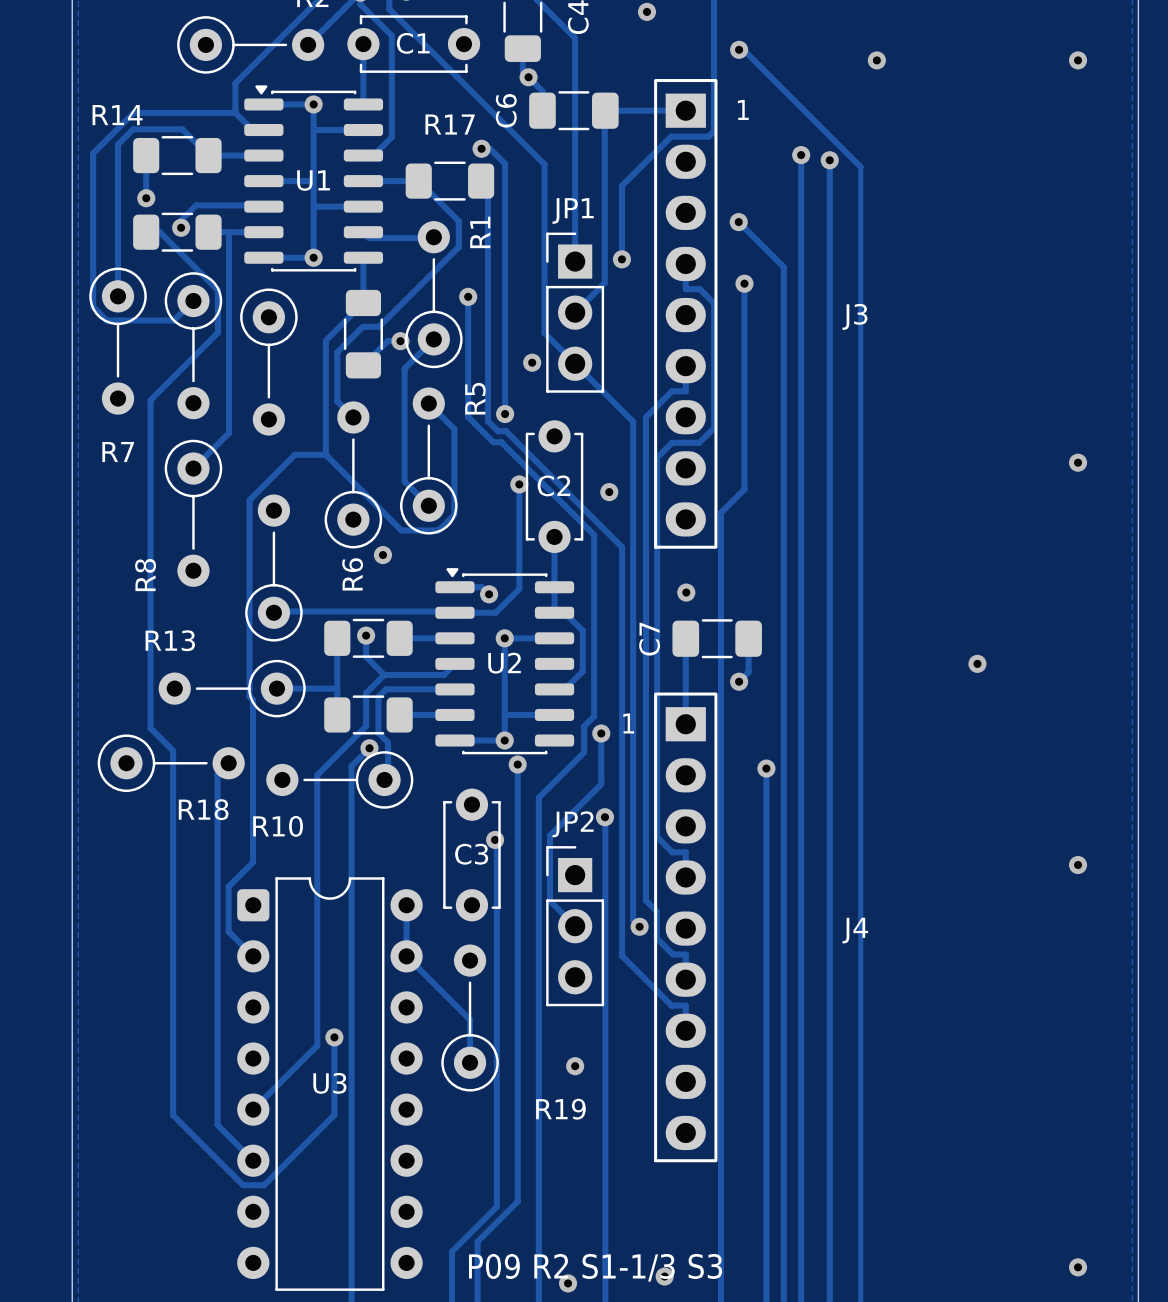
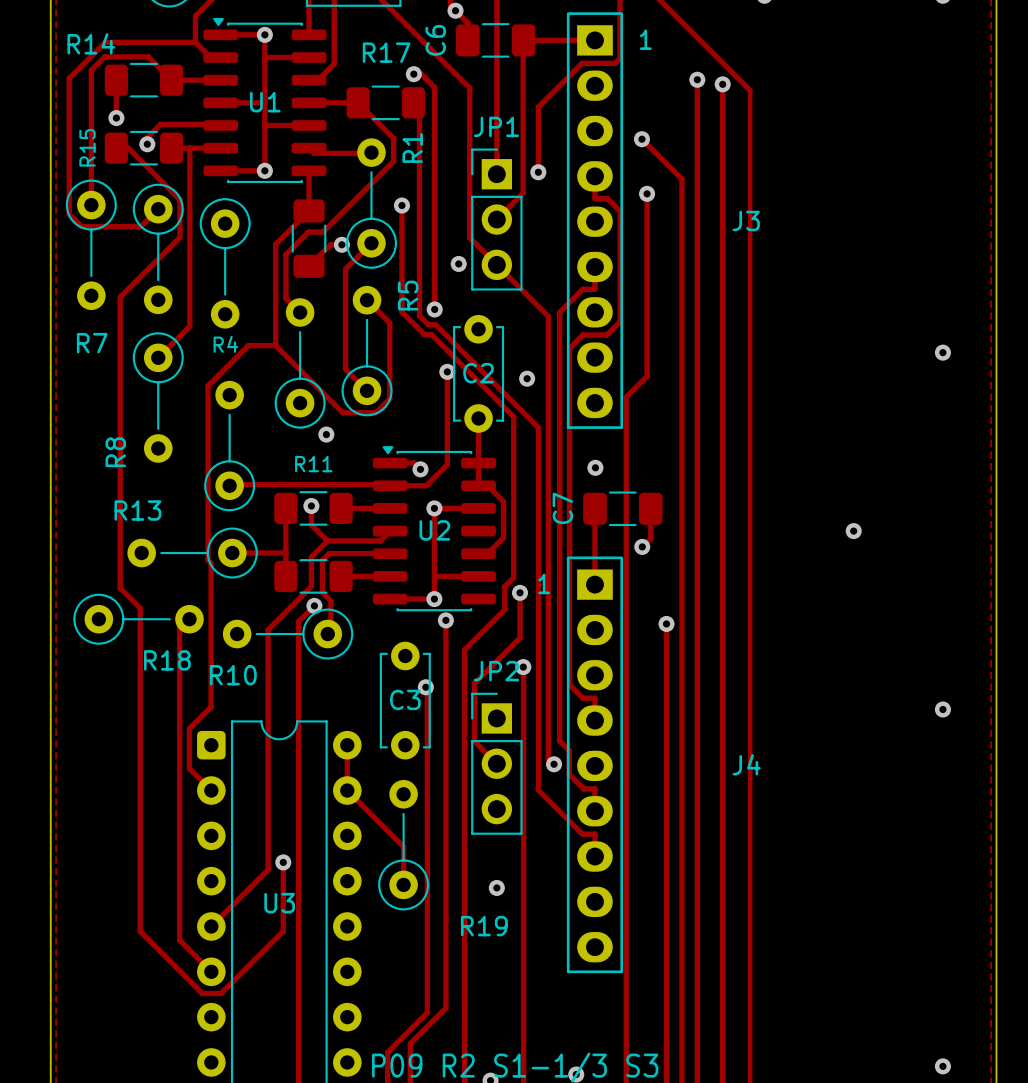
R15 name: none -> R15 (87, 147)
R4 name: none -> R4 (225, 344)
R6 name: R6 (352, 574) -> none
R11 name: none -> R11 (313, 464)

